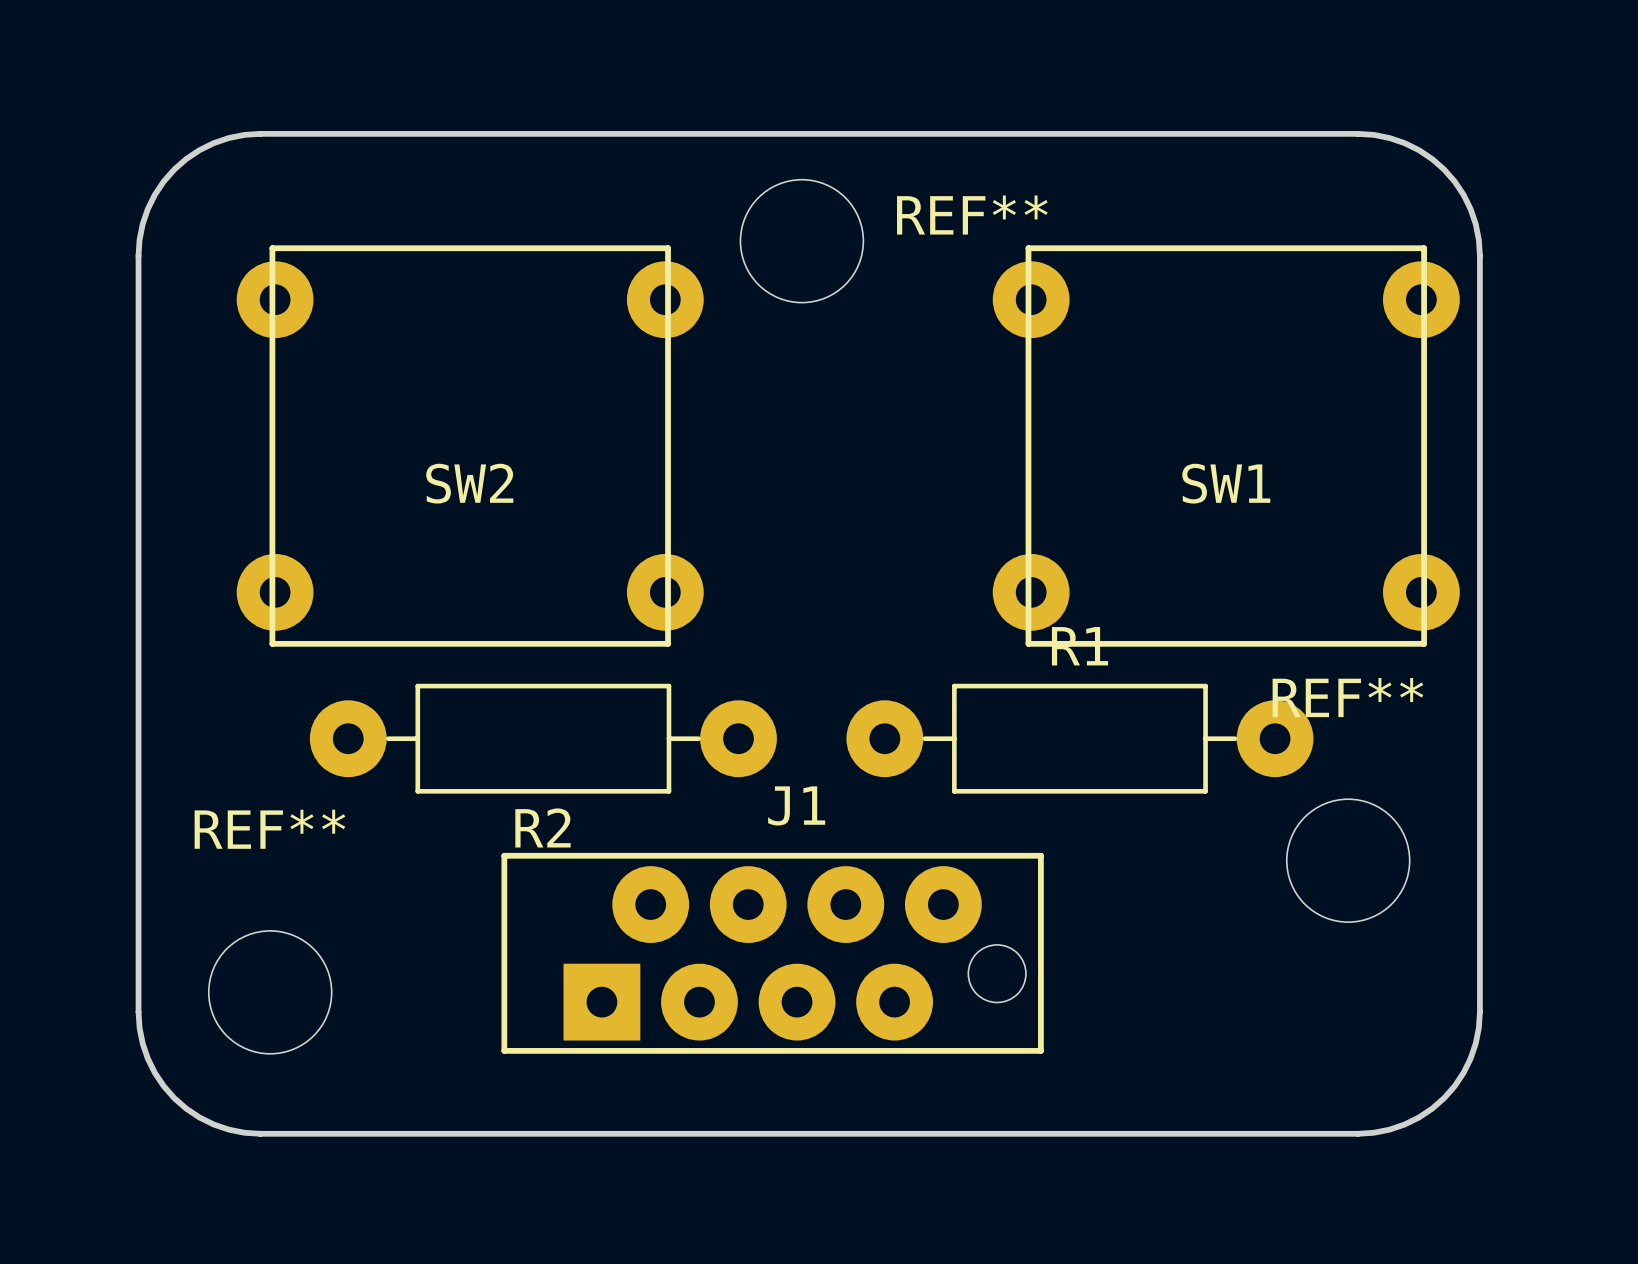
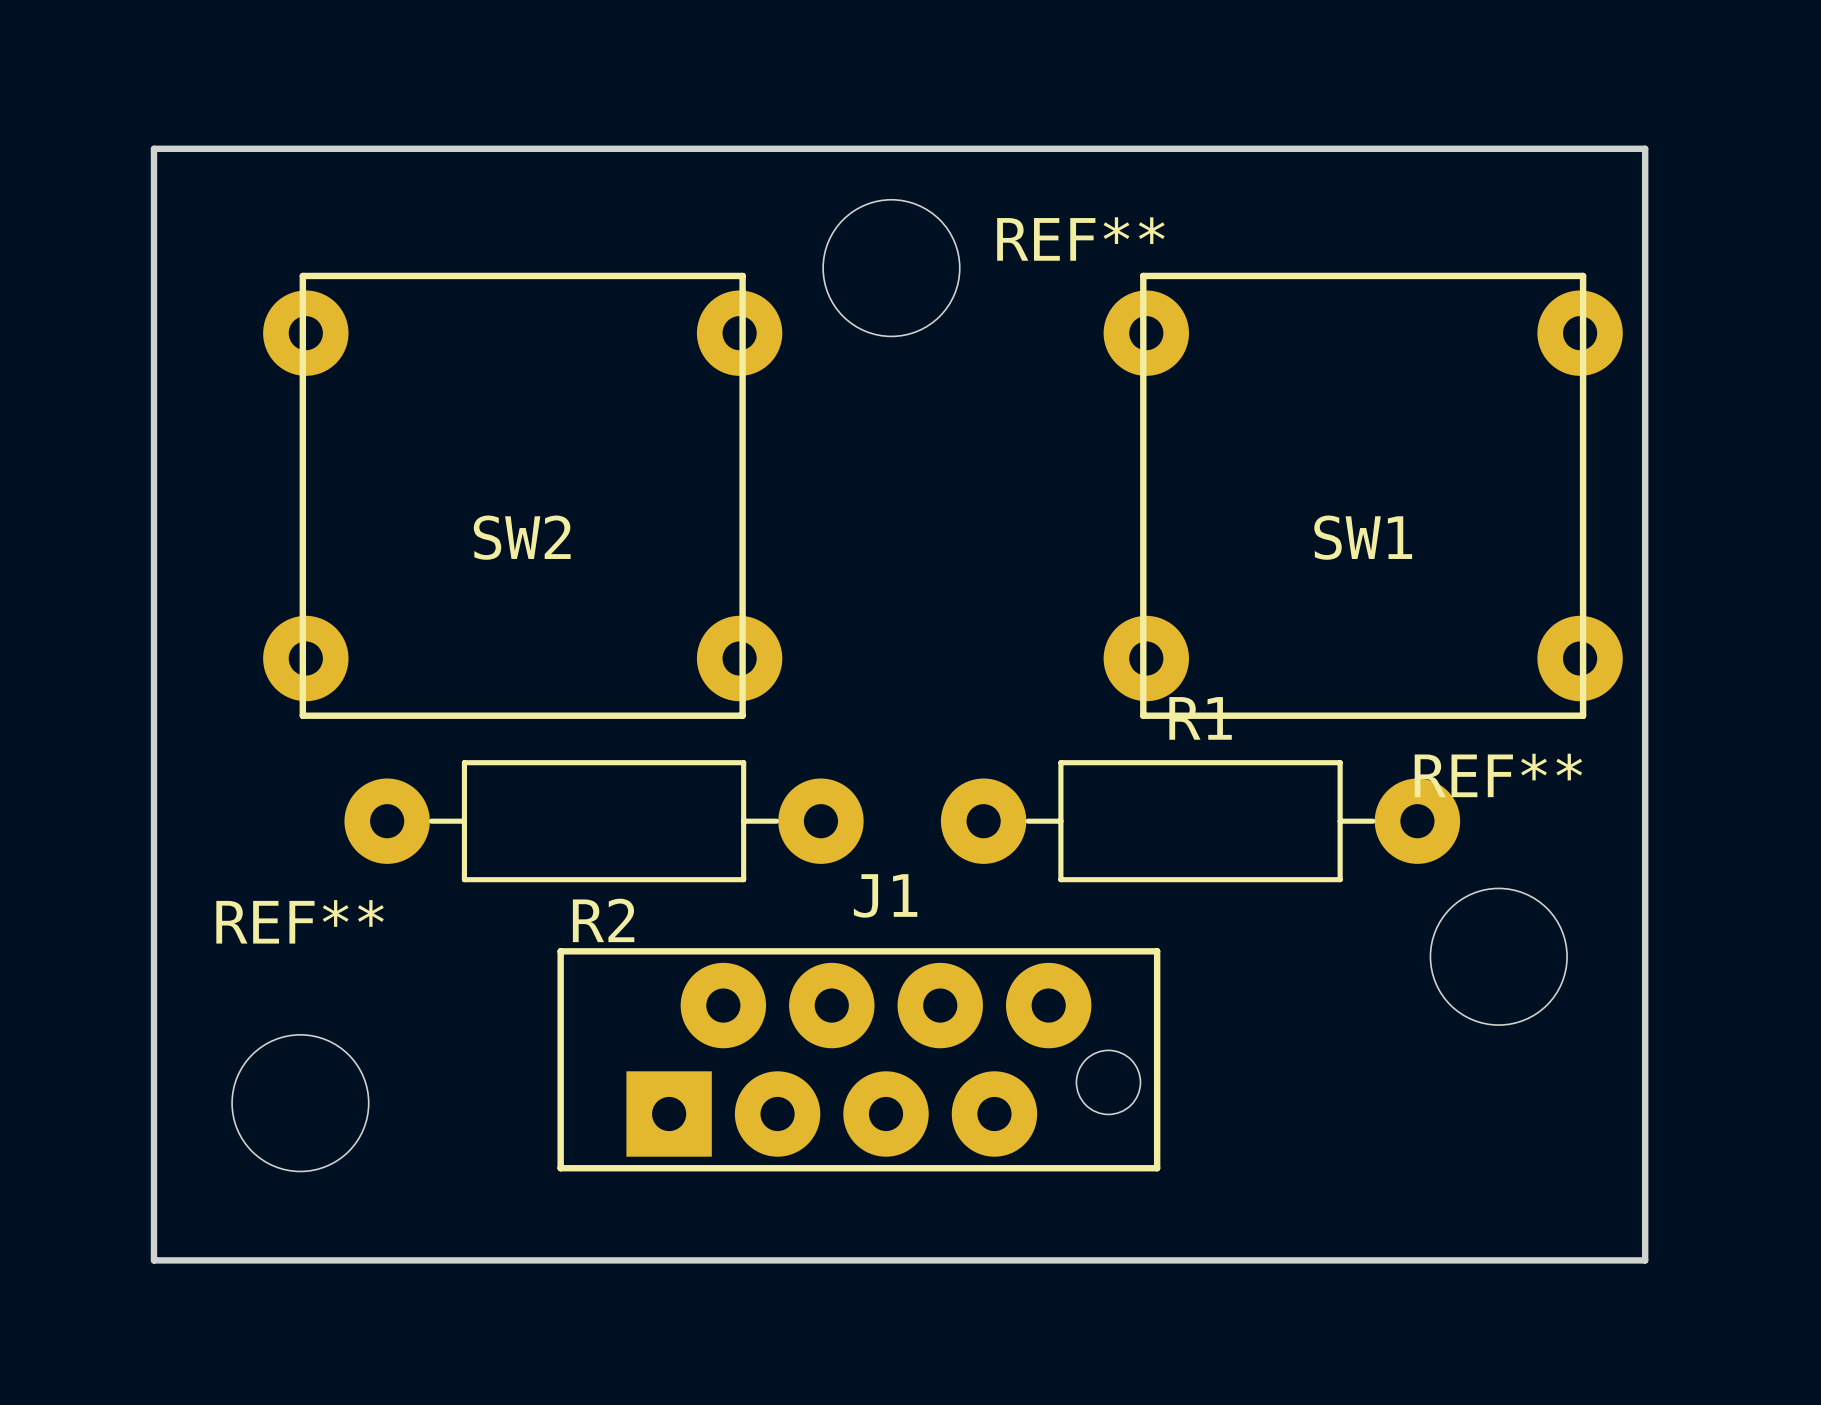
board edge: (260, 133) (228, 138) (213, 143) (186, 159) (174, 169) (163, 181) (147, 209) (142, 224) (138, 255) -> (289, 148) (153, 148) (153, 284)
board edge: (1357, 133) (1389, 138) (1404, 143) (1418, 150) (1444, 169) (1463, 194) (1470, 209) (1475, 224) (1479, 255) -> (1509, 148) (1645, 148) (1645, 284)
board edge: (138, 1011) (142, 1043) (147, 1058) (163, 1086) (174, 1098) (186, 1108) (213, 1124) (228, 1129) (260, 1133) -> (153, 1124) (153, 1260) (289, 1260)
board edge: (1479, 1011) (1478, 1027) (1470, 1058) (1463, 1072) (1444, 1098) (1432, 1108) (1404, 1124) (1389, 1129) (1357, 1133) -> (1645, 1124) (1645, 1260) (1509, 1260)

